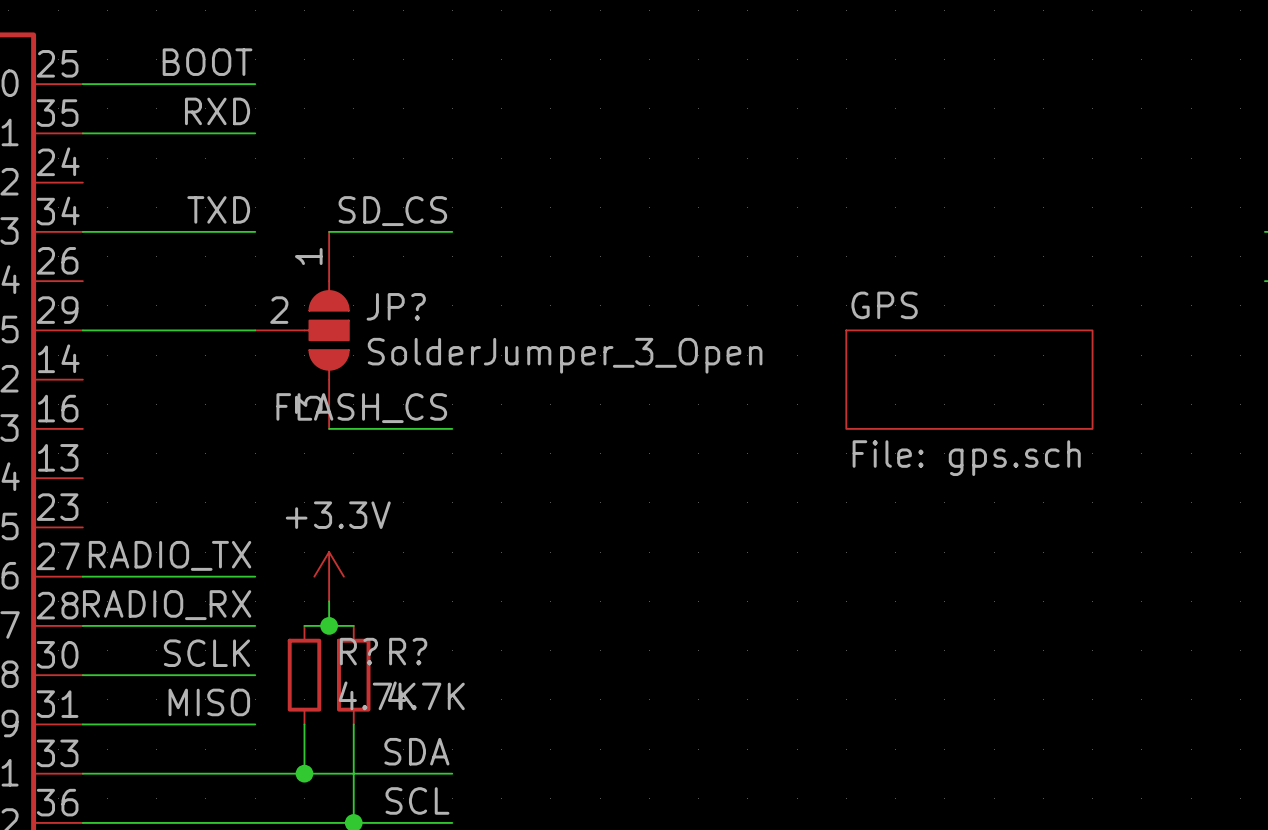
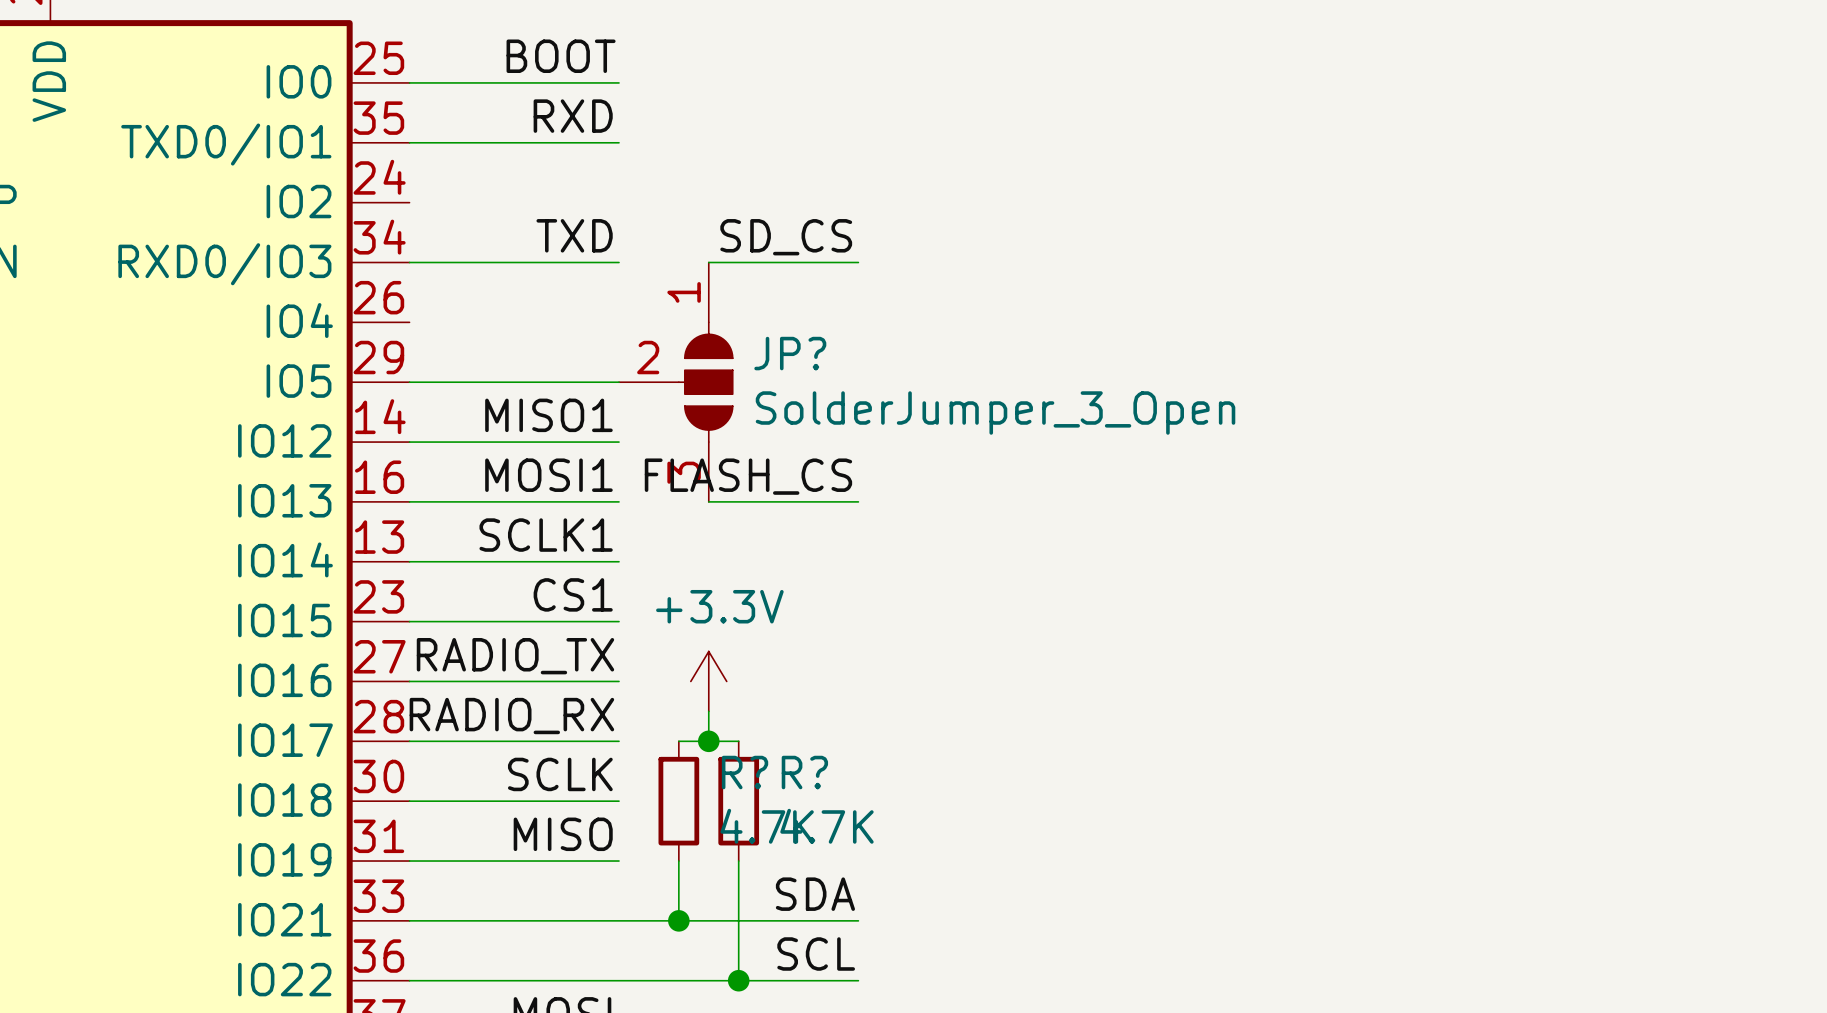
label: none -> MISO1 (548, 415)
wire: none -> (409, 442) (619, 442)
sheet GPS: File: gps.sch (969, 379) -> none
label: none -> MOSI1 (548, 475)
wire: none -> (409, 501) (619, 501)
label: none -> SCLK1 (546, 535)
wire: none -> (409, 561) (619, 561)
label: none -> CS1 (573, 594)
wire: none -> (409, 621) (619, 621)

